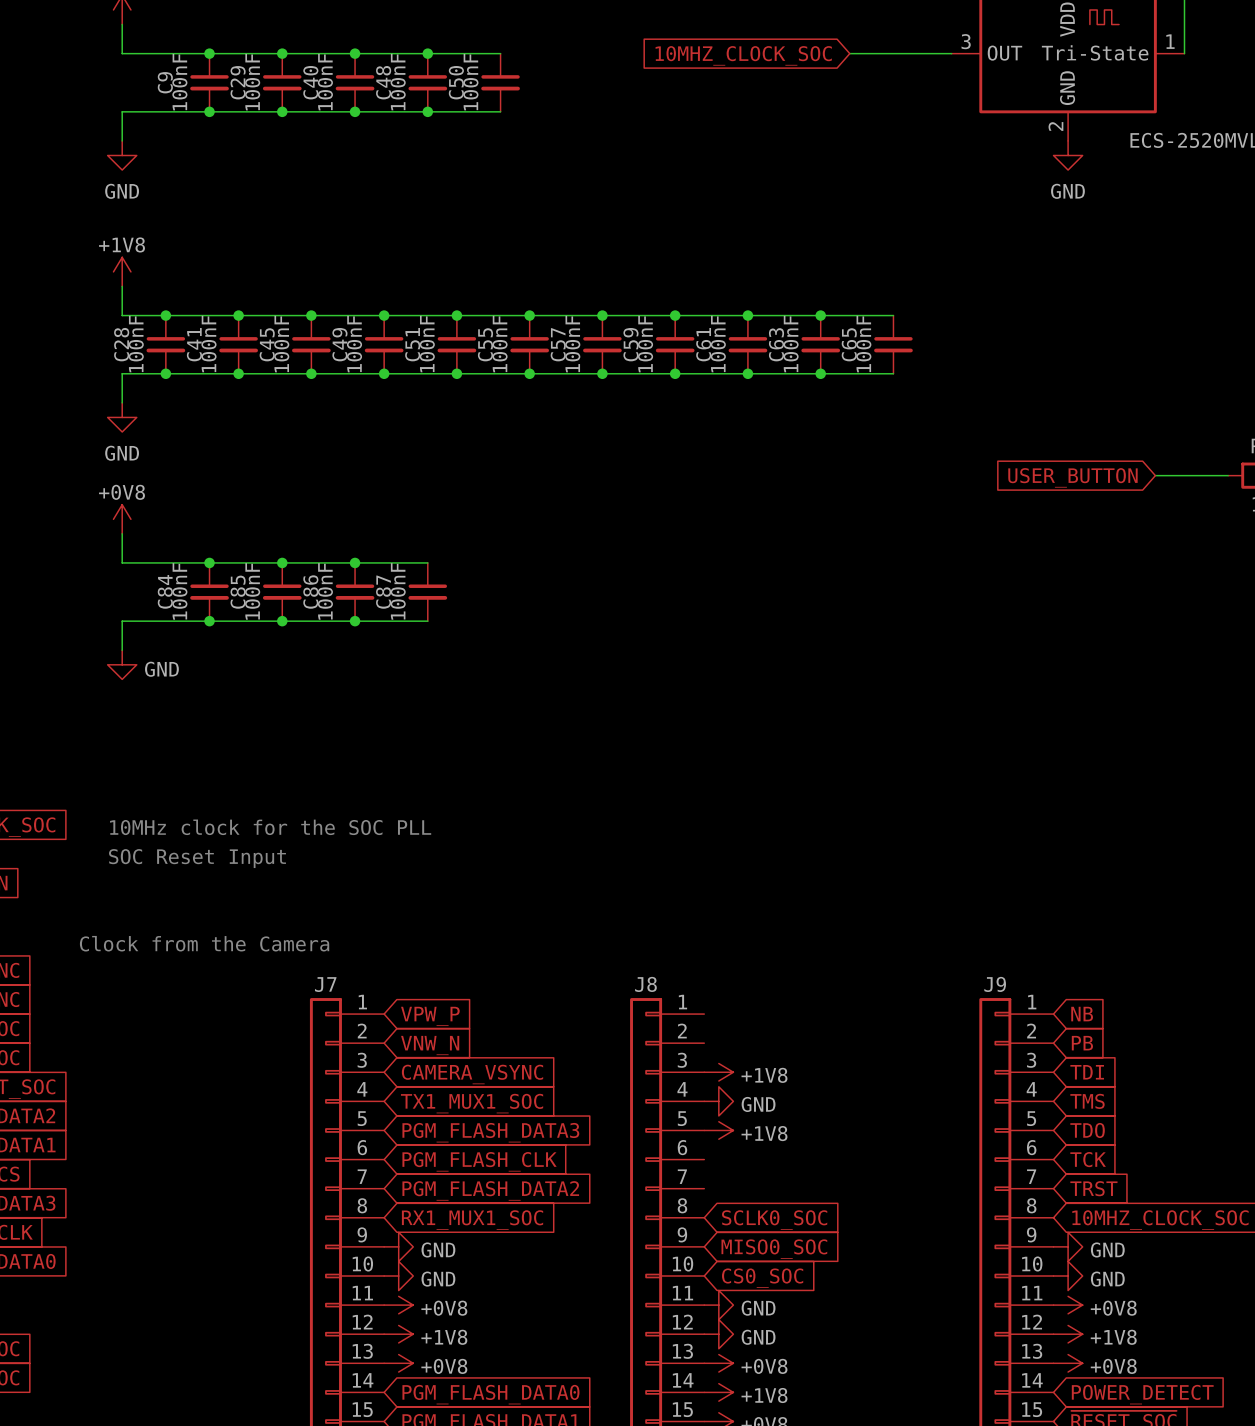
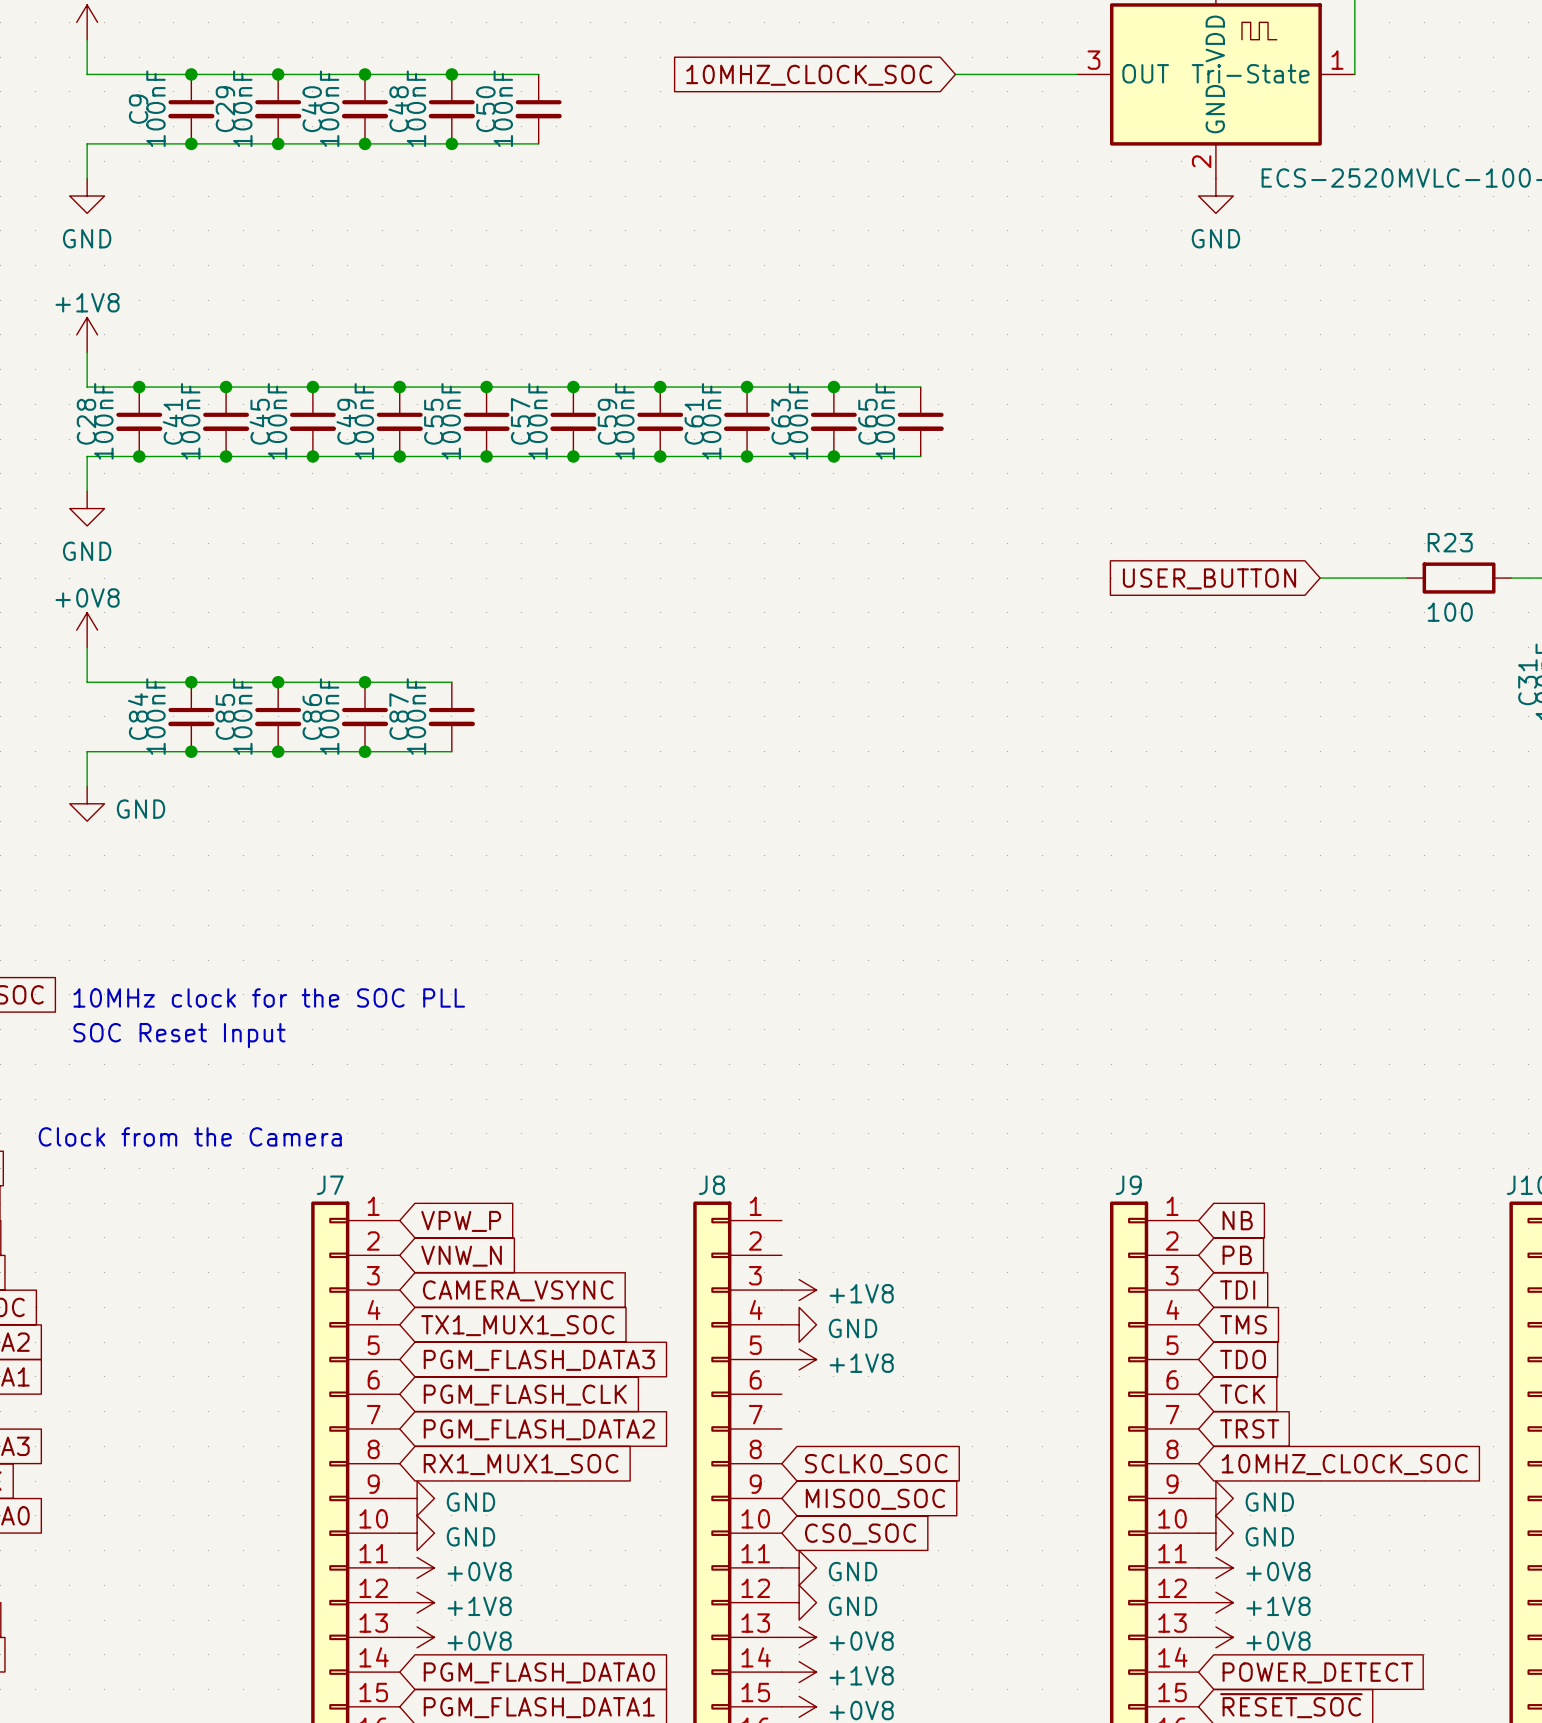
wire: (820, 315) (893, 315) -> none
junction: (820, 315) -> none
C51 name: C51 (412, 344) -> C55 (433, 421)
C55 name: C55 (485, 344) -> C57 (520, 421)
C57 name: C57 (558, 344) -> C59 (607, 421)
C59 name: C59 (630, 344) -> C61 (694, 421)
C61 name: C61 (703, 344) -> C63 (781, 421)
C63 name: C63 (776, 344) -> C65 (867, 421)
C65: 100nF (893, 344) -> none
wire: (820, 373) (893, 373) -> none
junction: (820, 373) -> none

